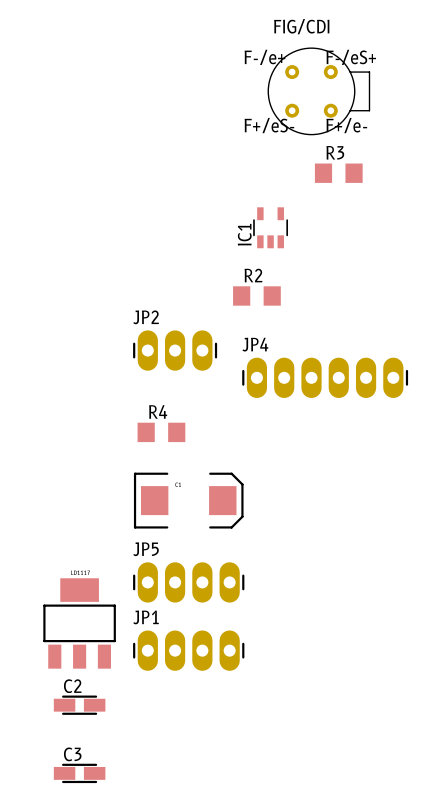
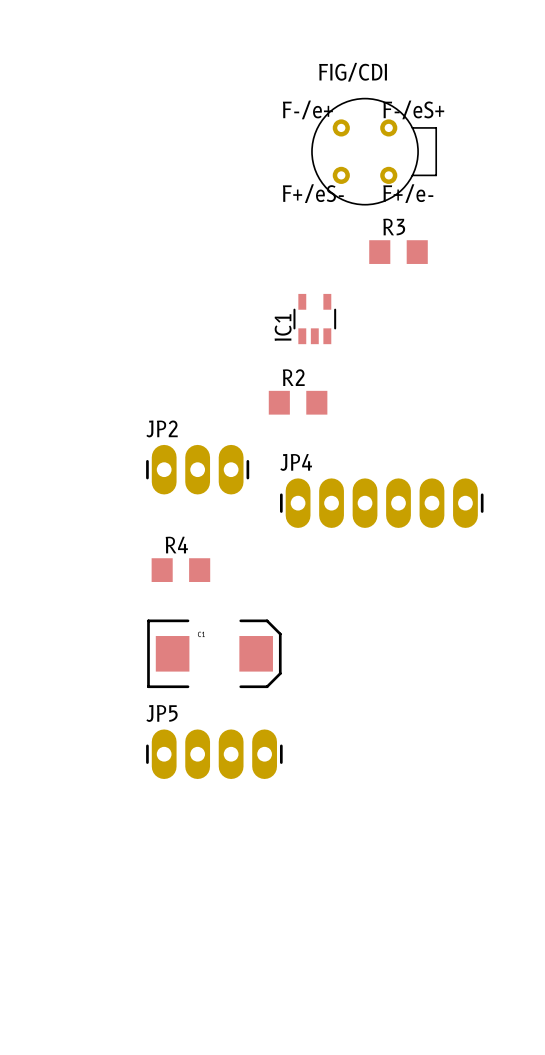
part: (79, 623) -> none
JP1: (188, 650) -> none
C2: (79, 705) -> none
C3: (79, 773) -> none

